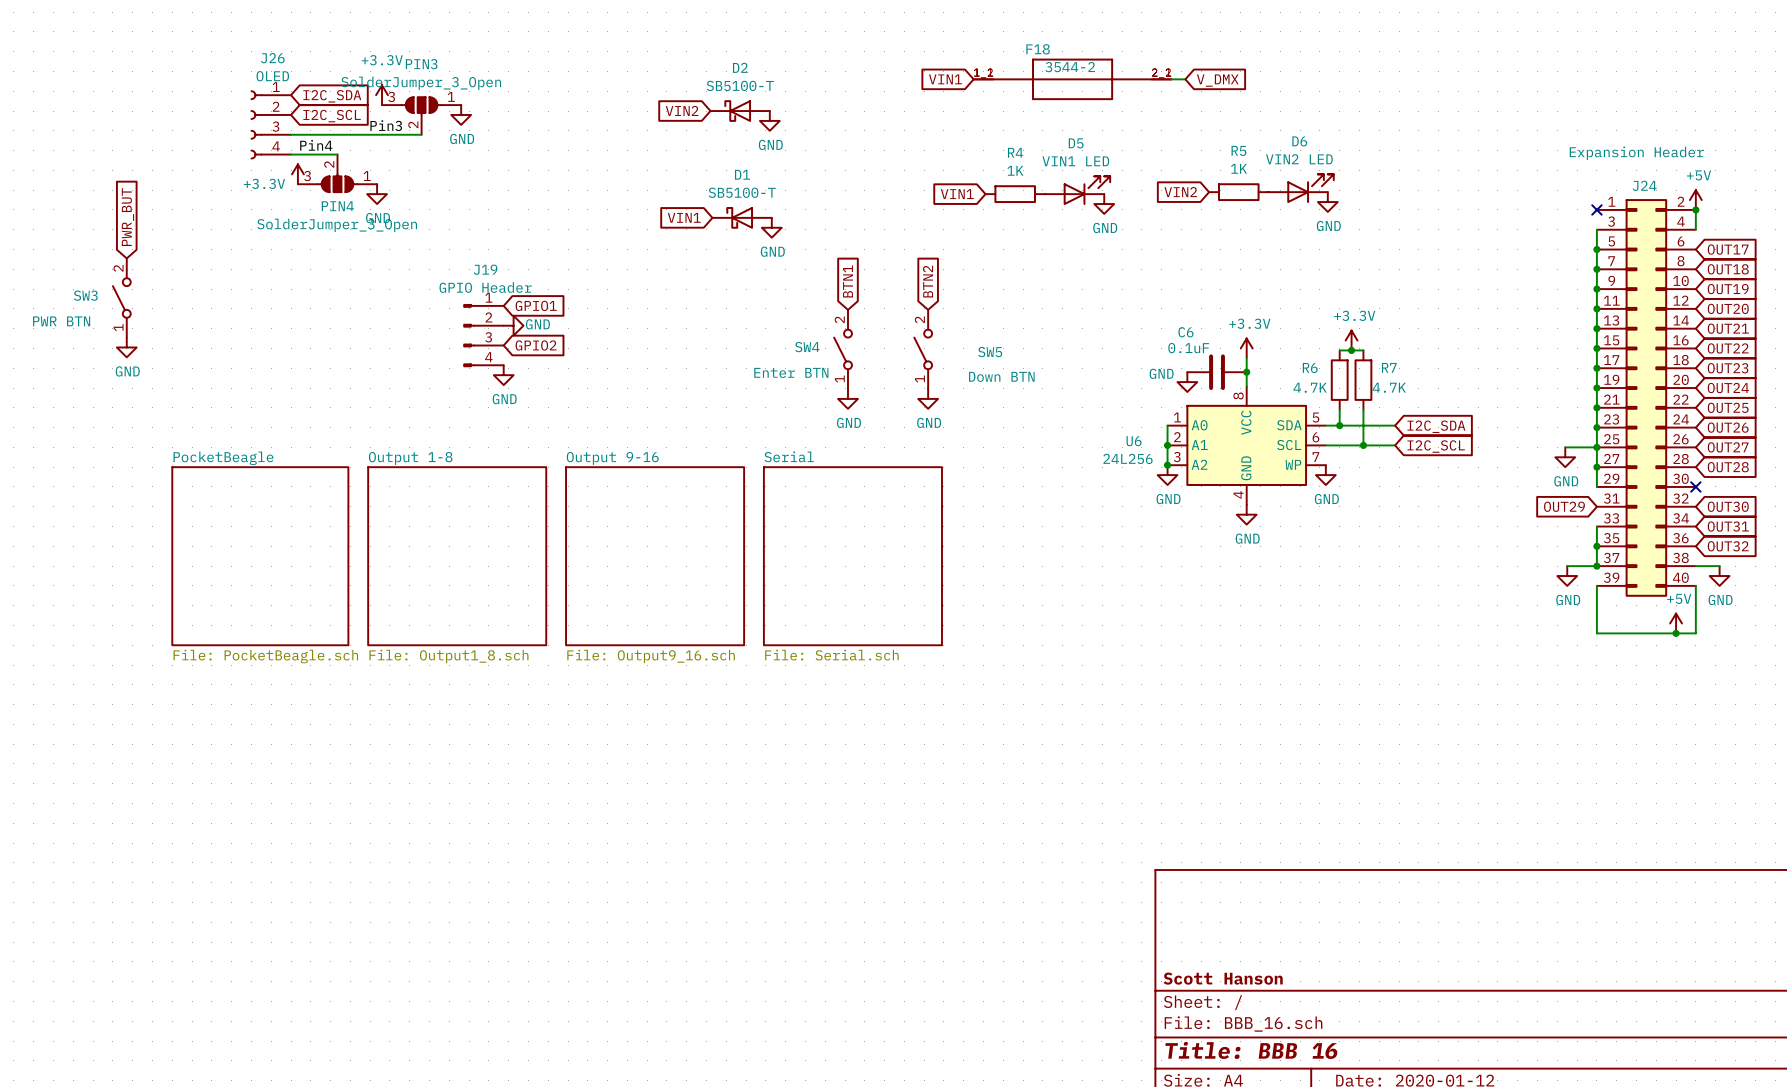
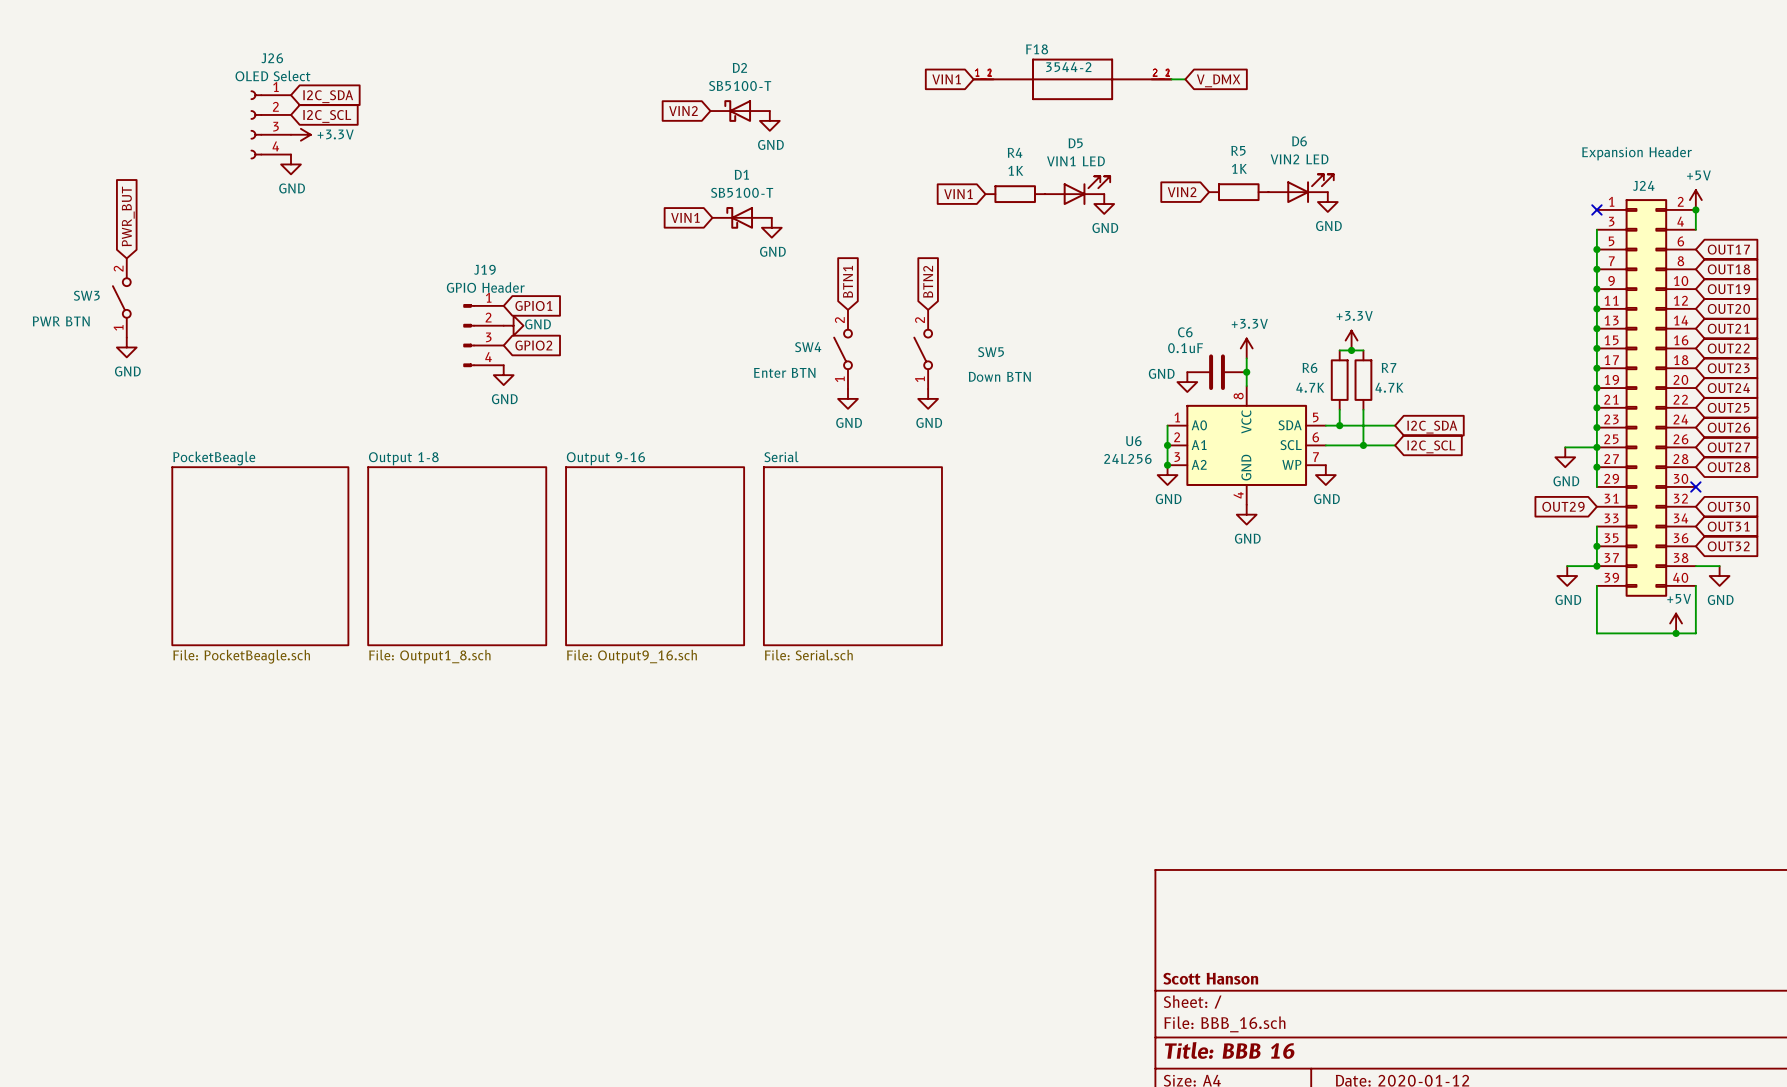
J26 value: OLED (272, 76) -> OLED Select (272, 75)
power symbol: +3.3V (382, 95) -> none
power symbol: GND (461, 114) -> none
PIN3: SolderJumper_3_Open (421, 115) -> none
label: Pin3 (386, 125) -> none
wire: (291, 134) (421, 134) -> none
label: Pin4 (316, 145) -> none
wire: (291, 154) (337, 154) -> none
power symbol: none -> GND (291, 164)
PIN4: SolderJumper_3_Open (337, 173) -> none
power symbol rotation: 0° (297, 174) -> 90° clockwise (300, 134)
power symbol position: +3.3V (297, 174) -> +3.3V (300, 134)
power symbol text position: +3.3V (264, 183) -> +3.3V (335, 134)
power symbol: GND (377, 194) -> none

